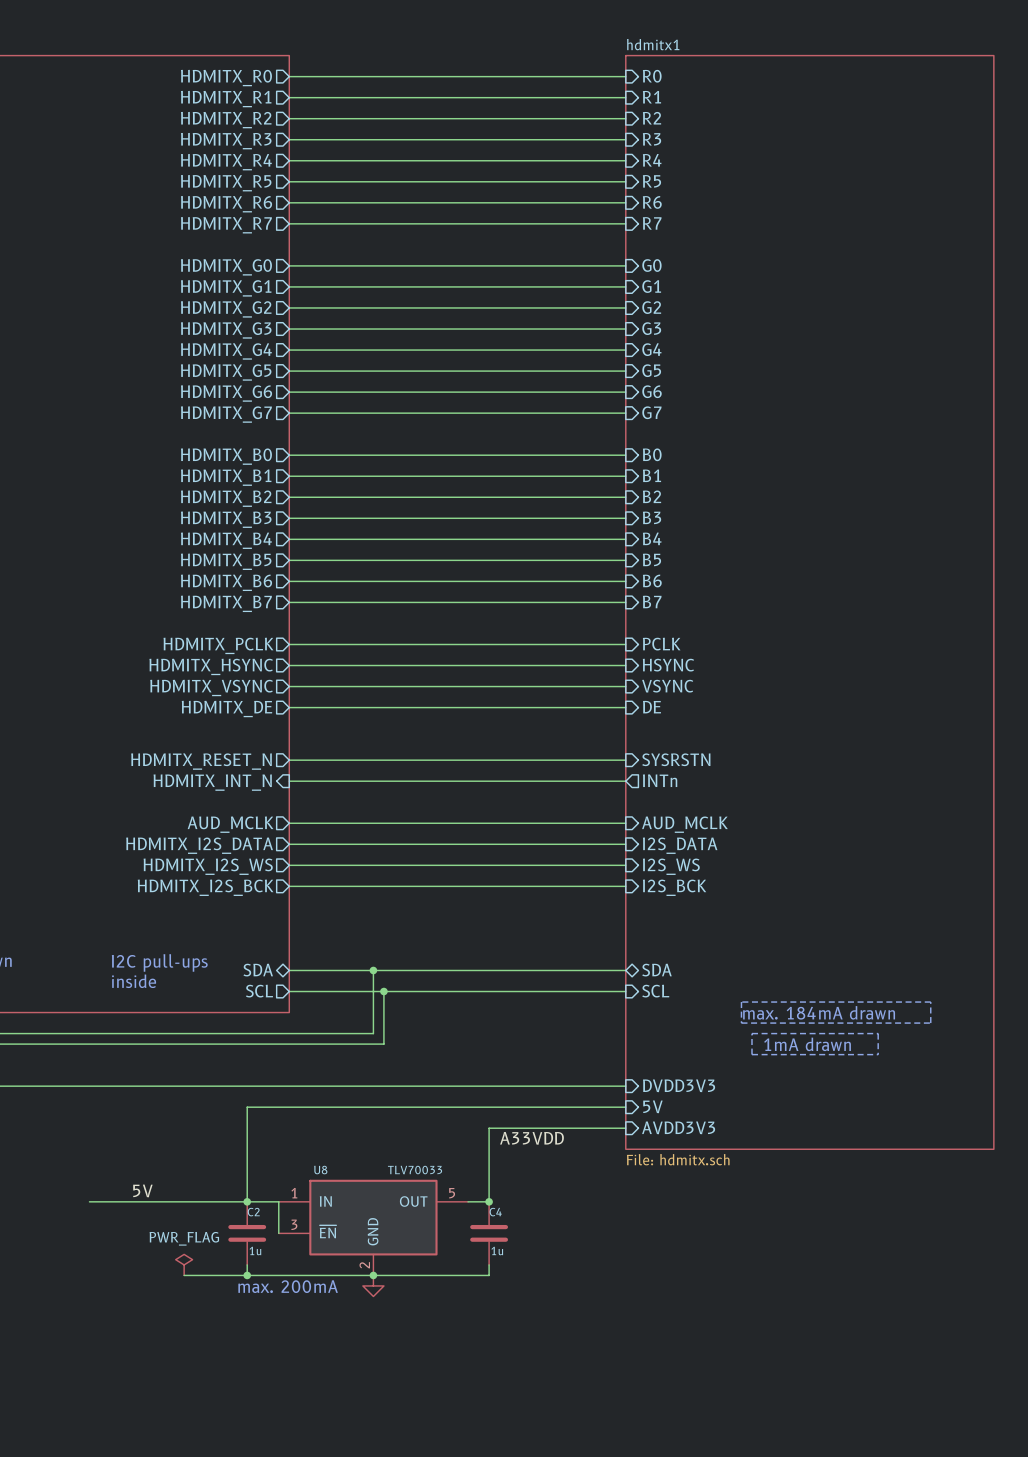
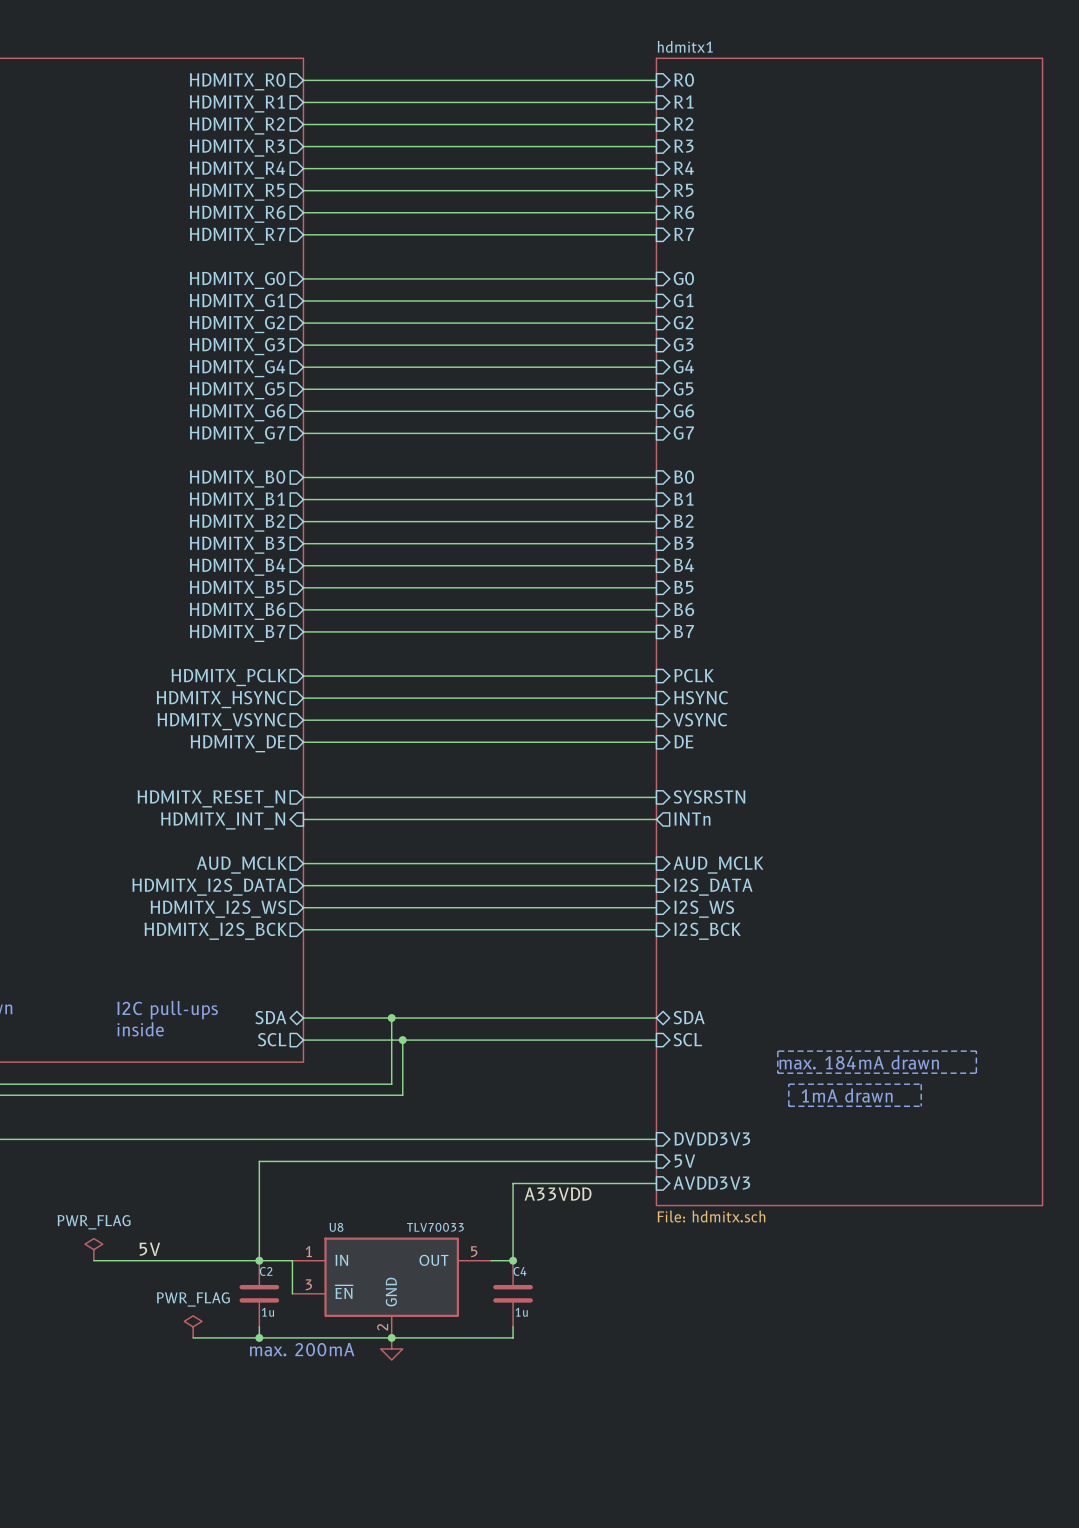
power symbol: none -> PWR_FLAG (93, 1249)

